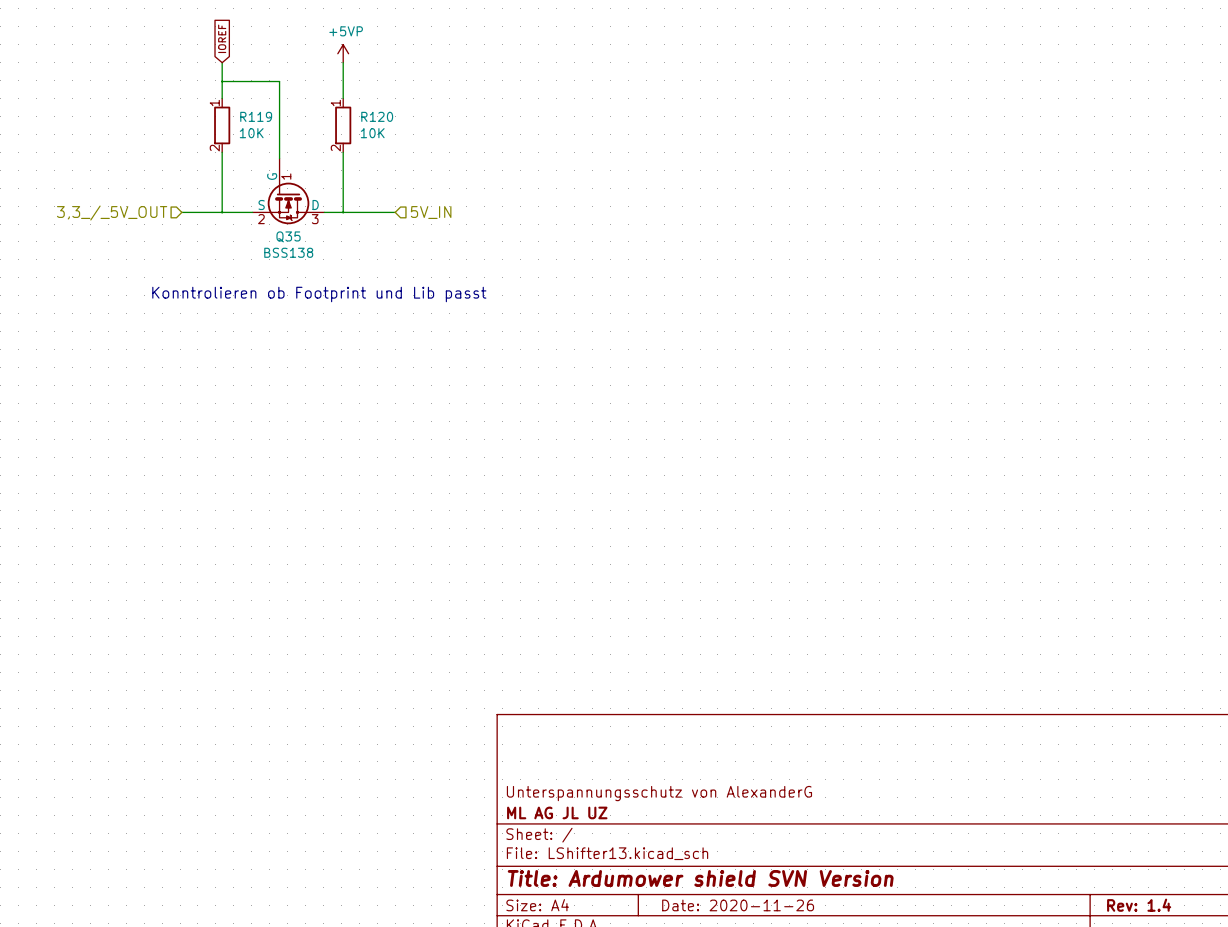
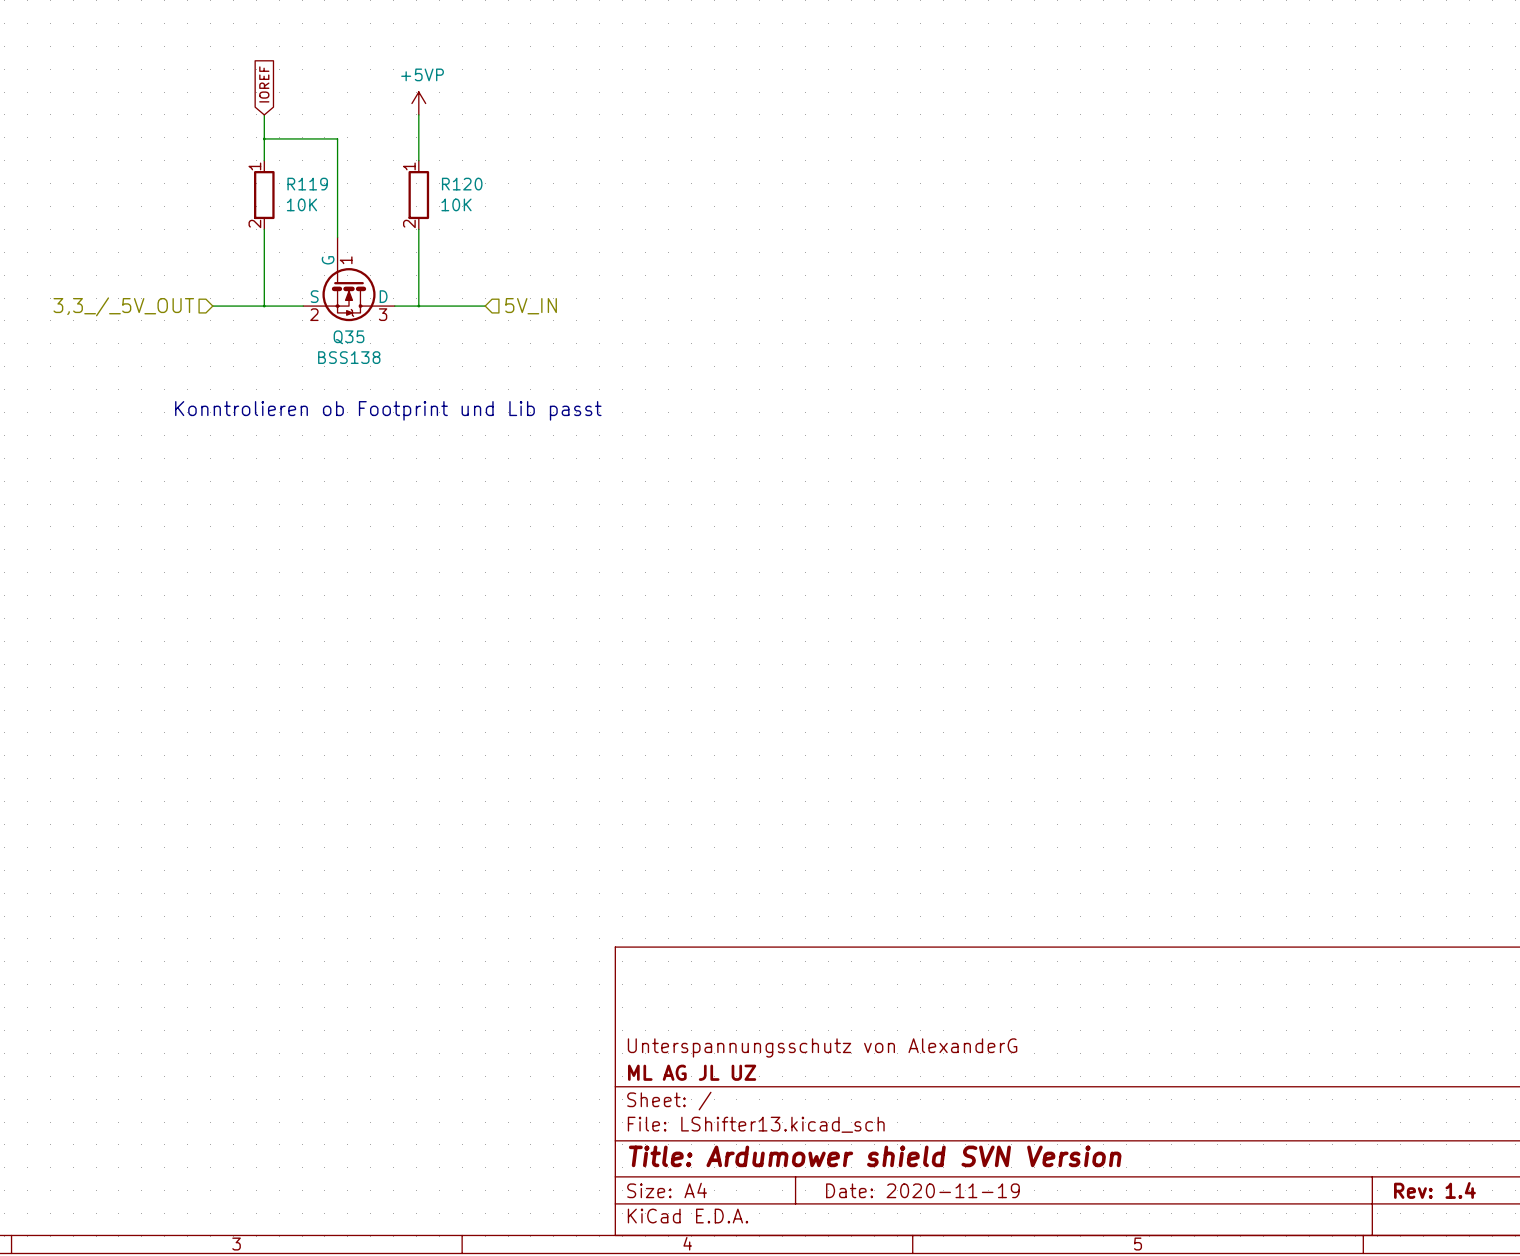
title block: Date: 2020-11-26 (738, 905) -> Date: 2020-11-19 (922, 1190)

